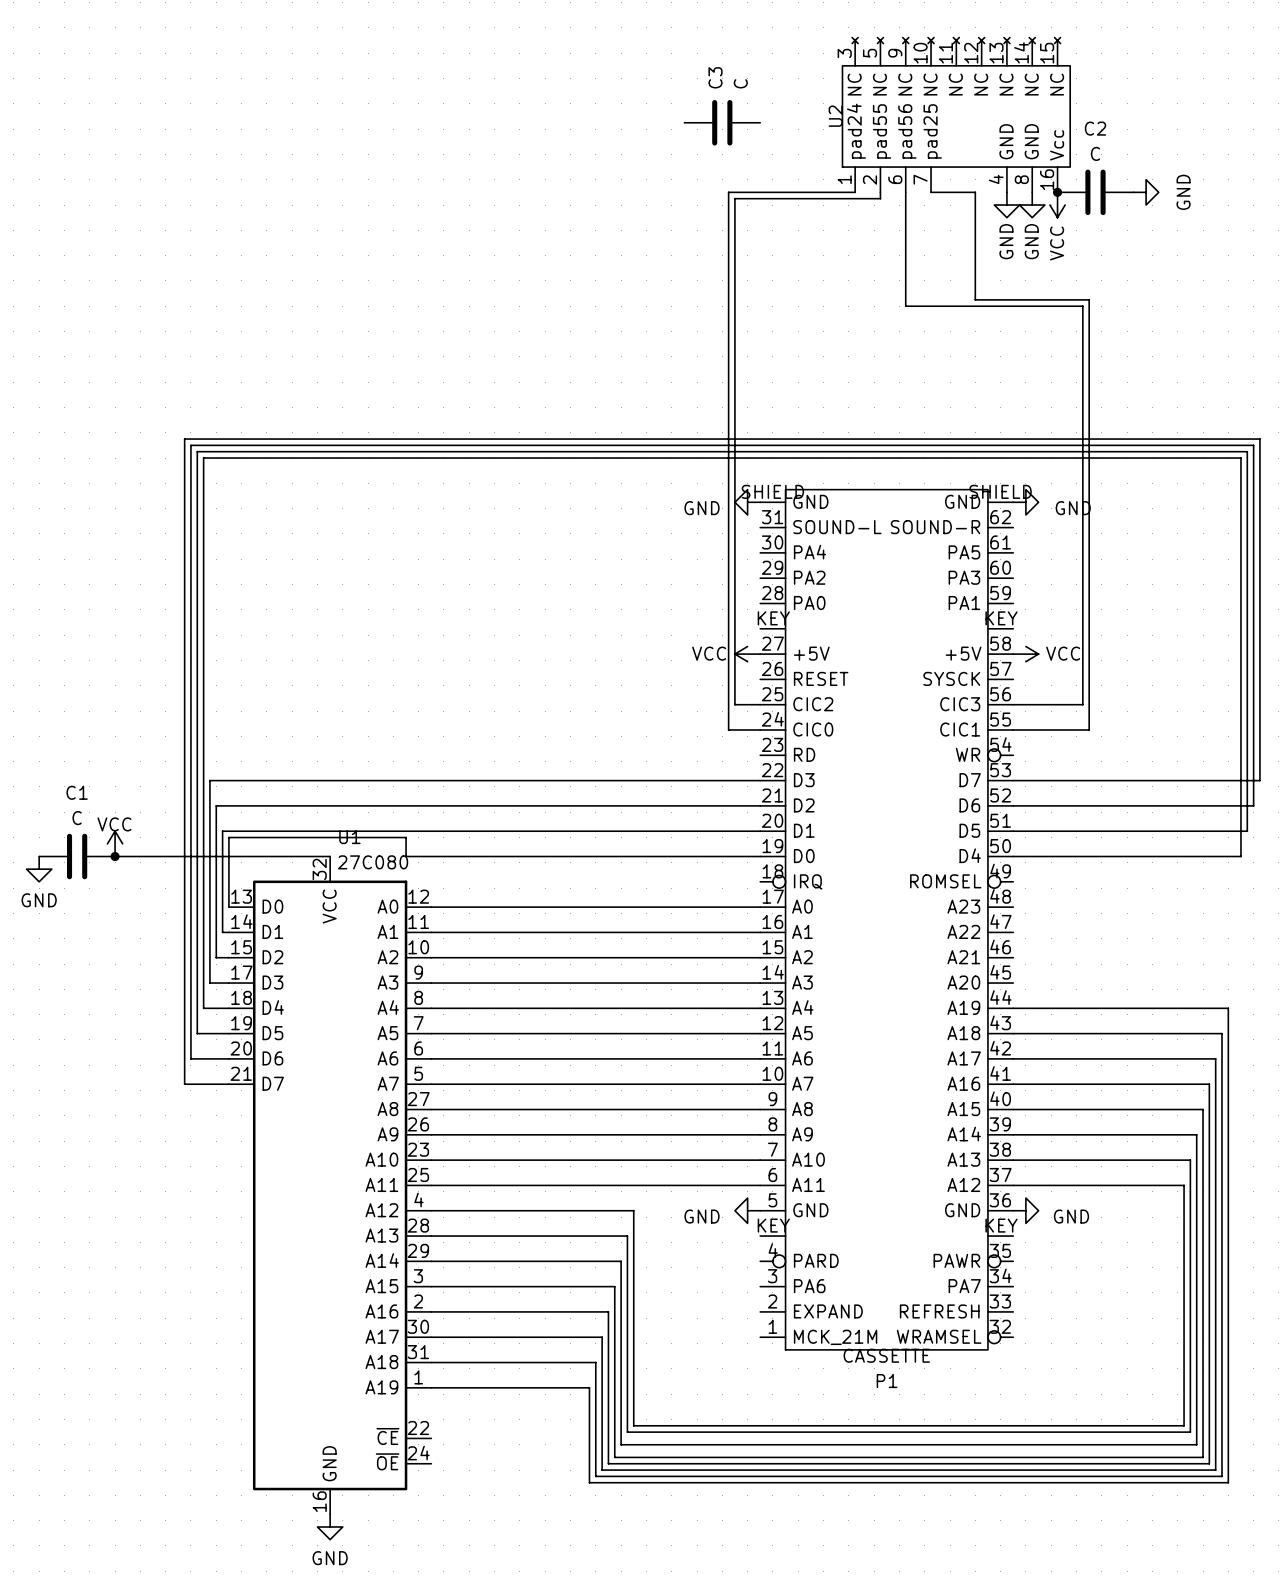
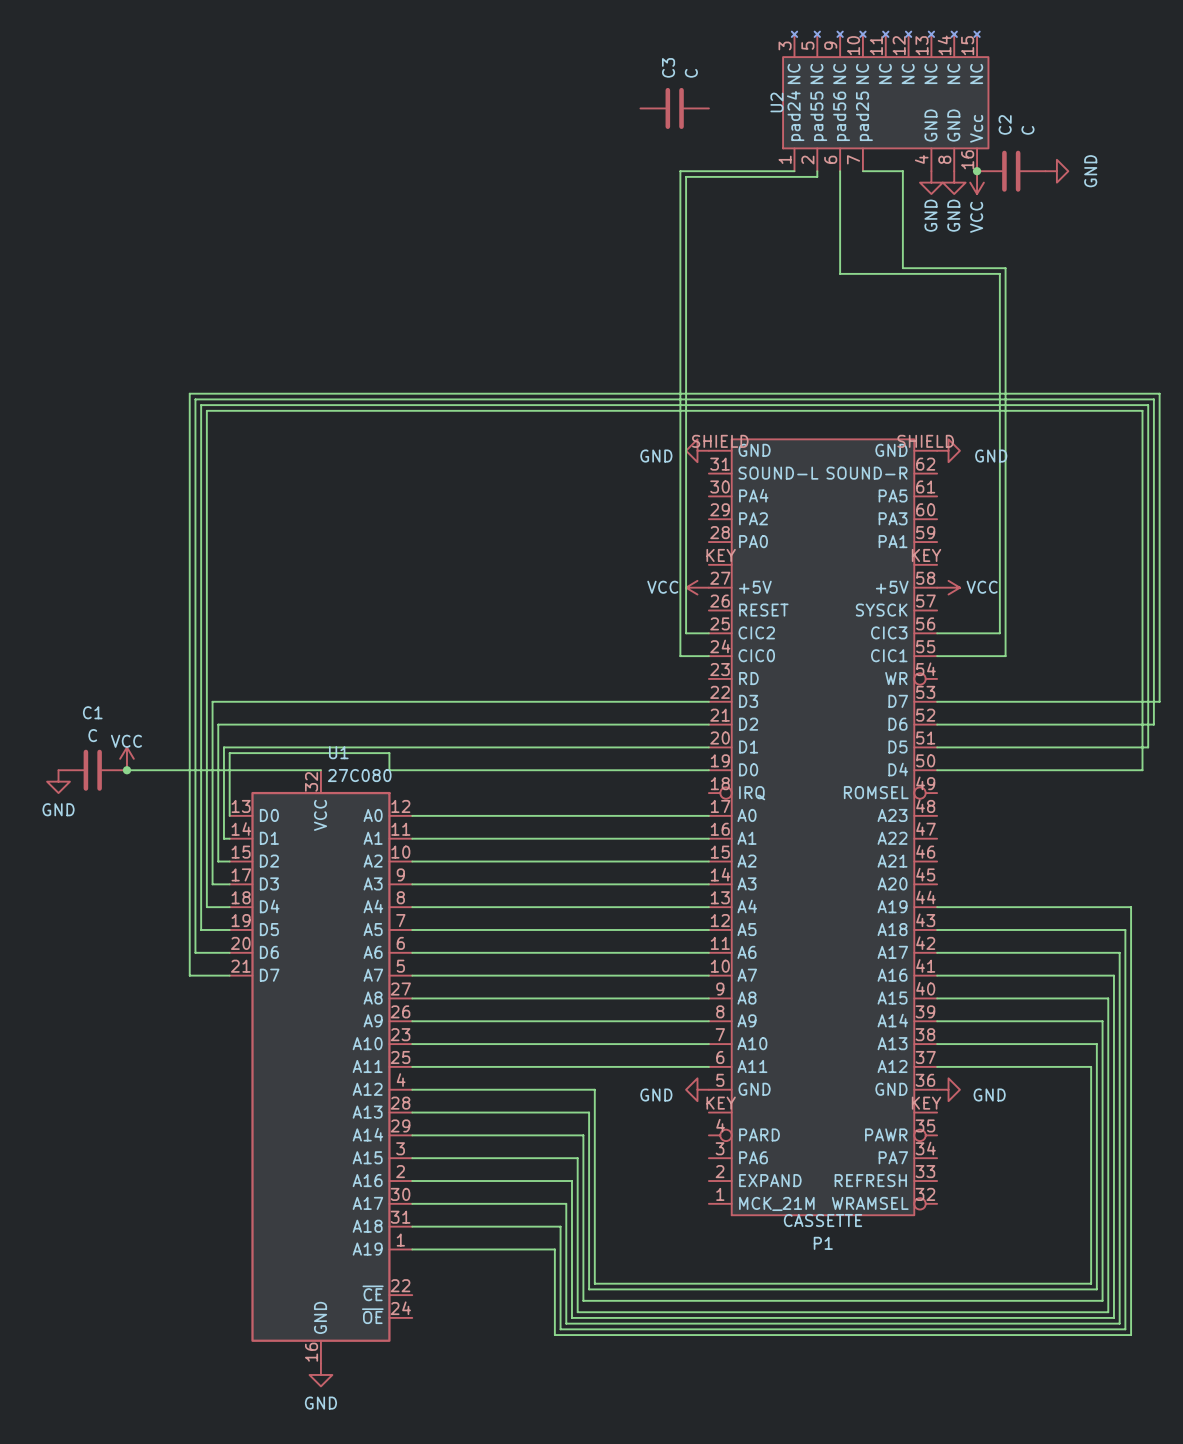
C2 name rotation: 0° (1095, 128) -> 90° counterclockwise (1005, 124)
C2 value rotation: 0° (1095, 153) -> 90° counterclockwise (1027, 130)

